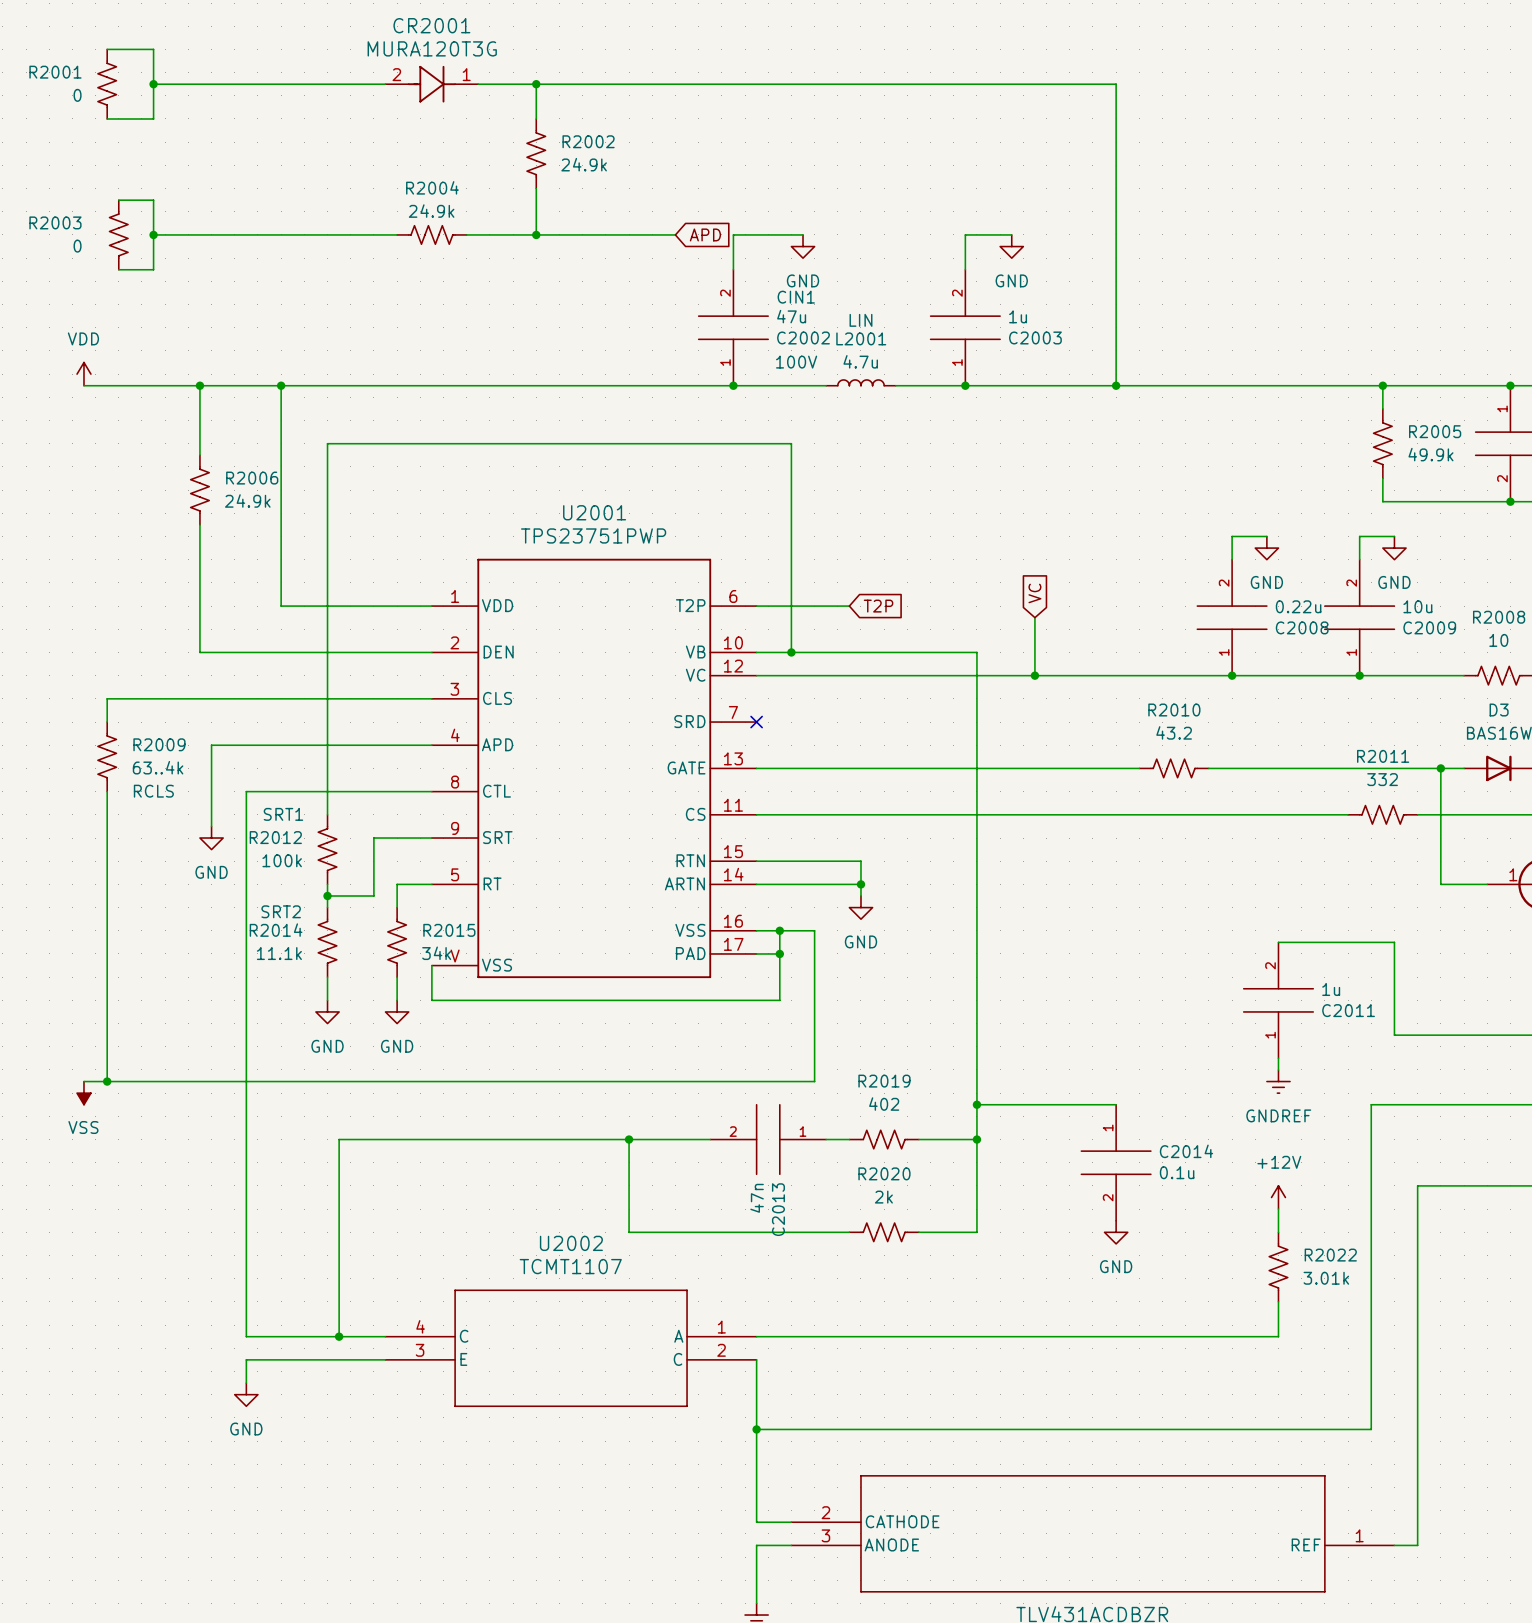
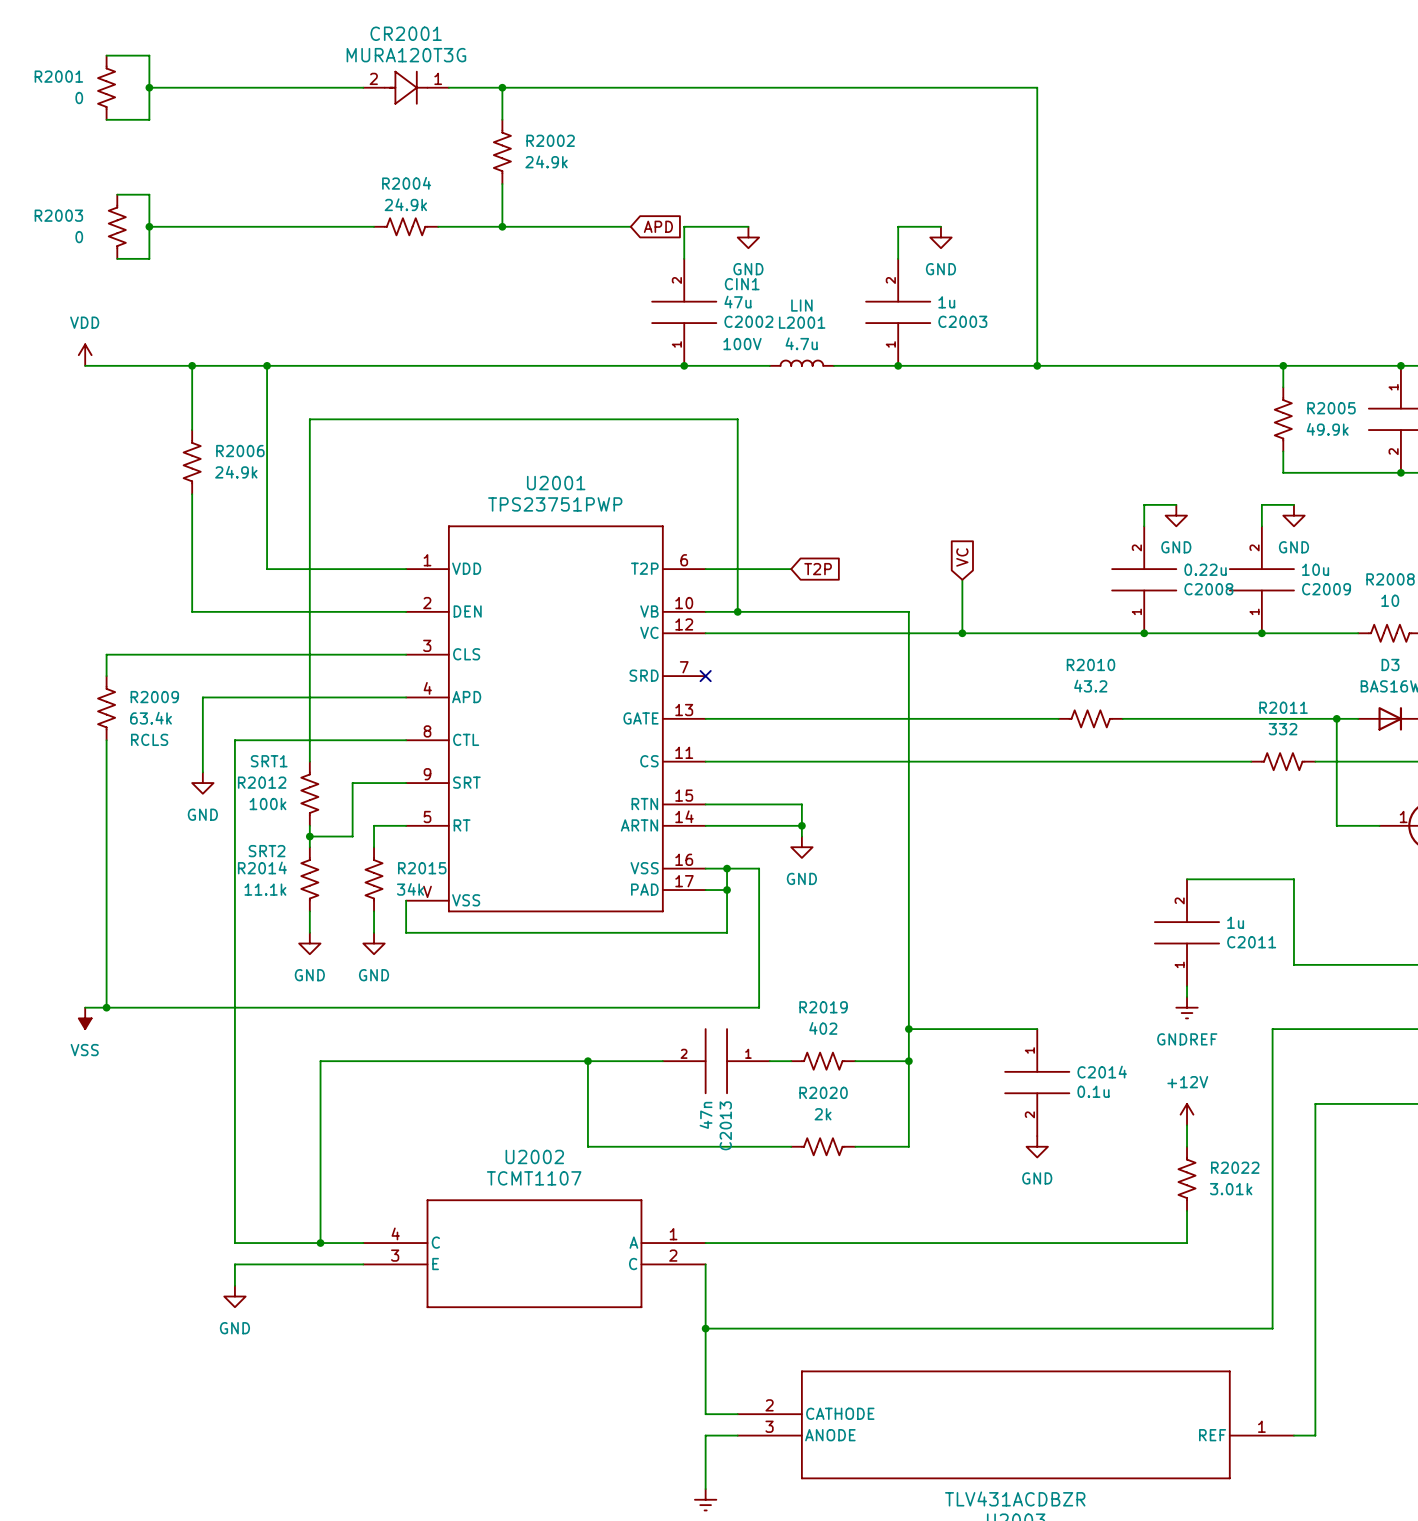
R2009 value: 63..4k (158, 767) -> 63.4k (150, 718)

